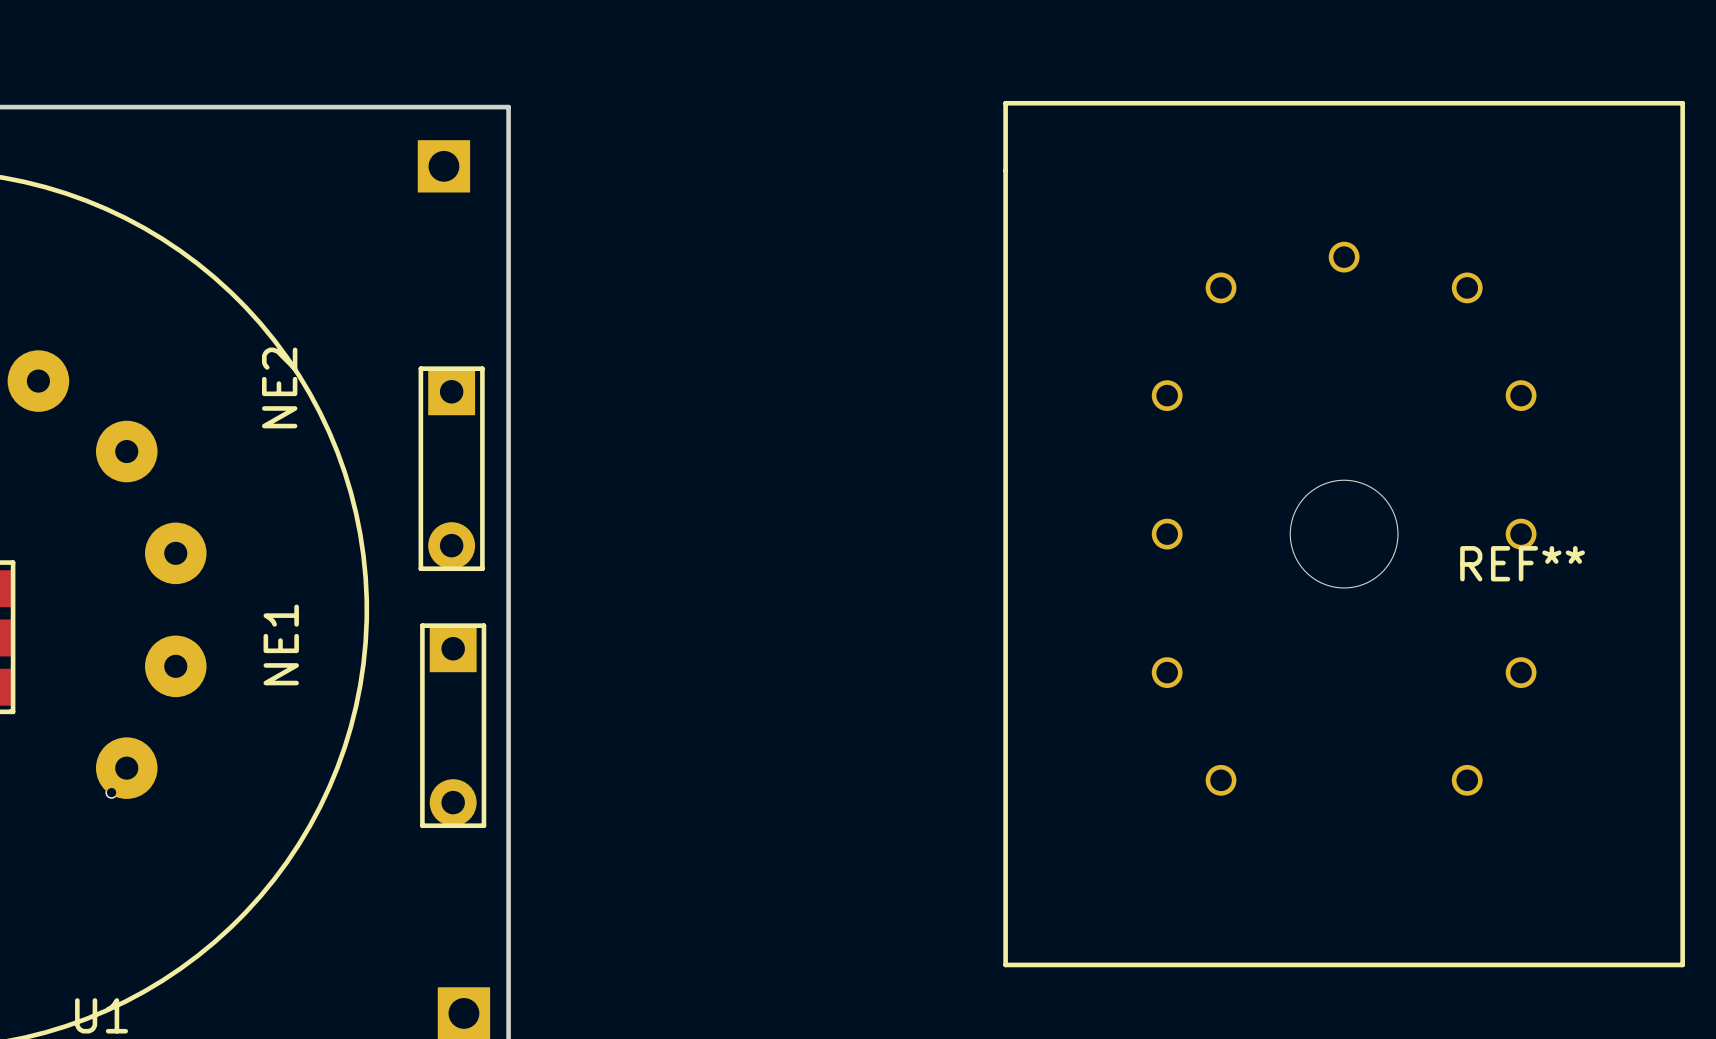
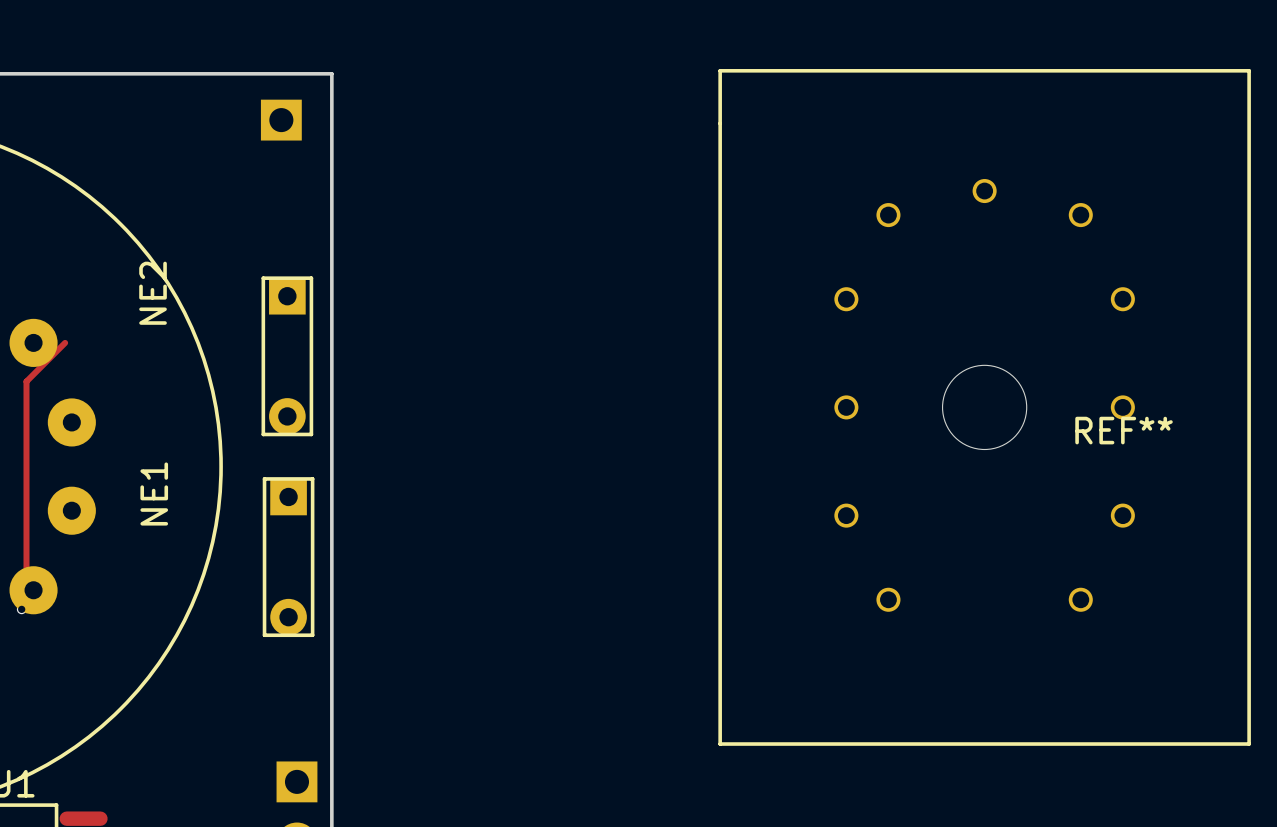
track: none -> (65, 342) (26, 381) (26, 604)

